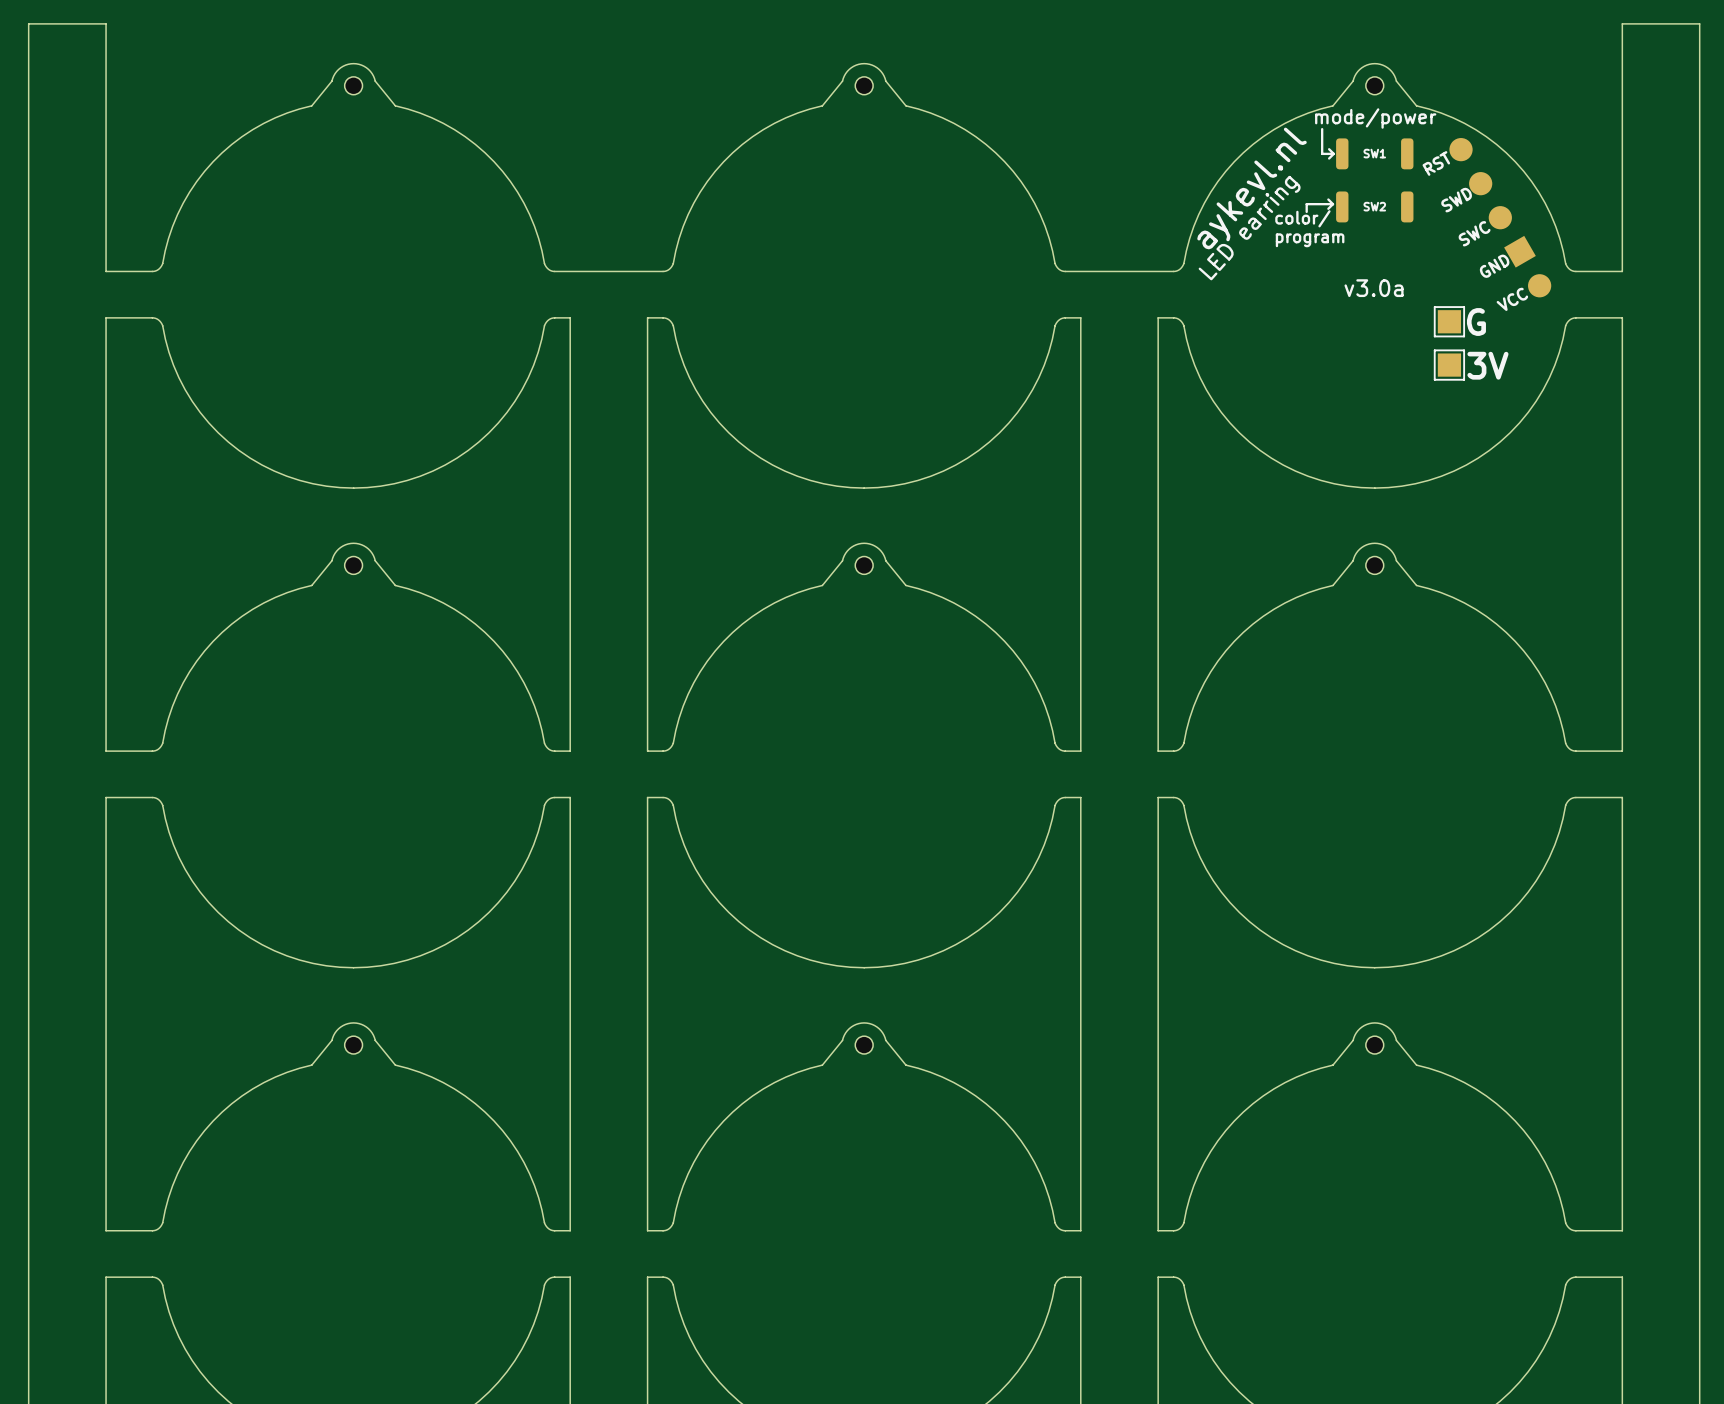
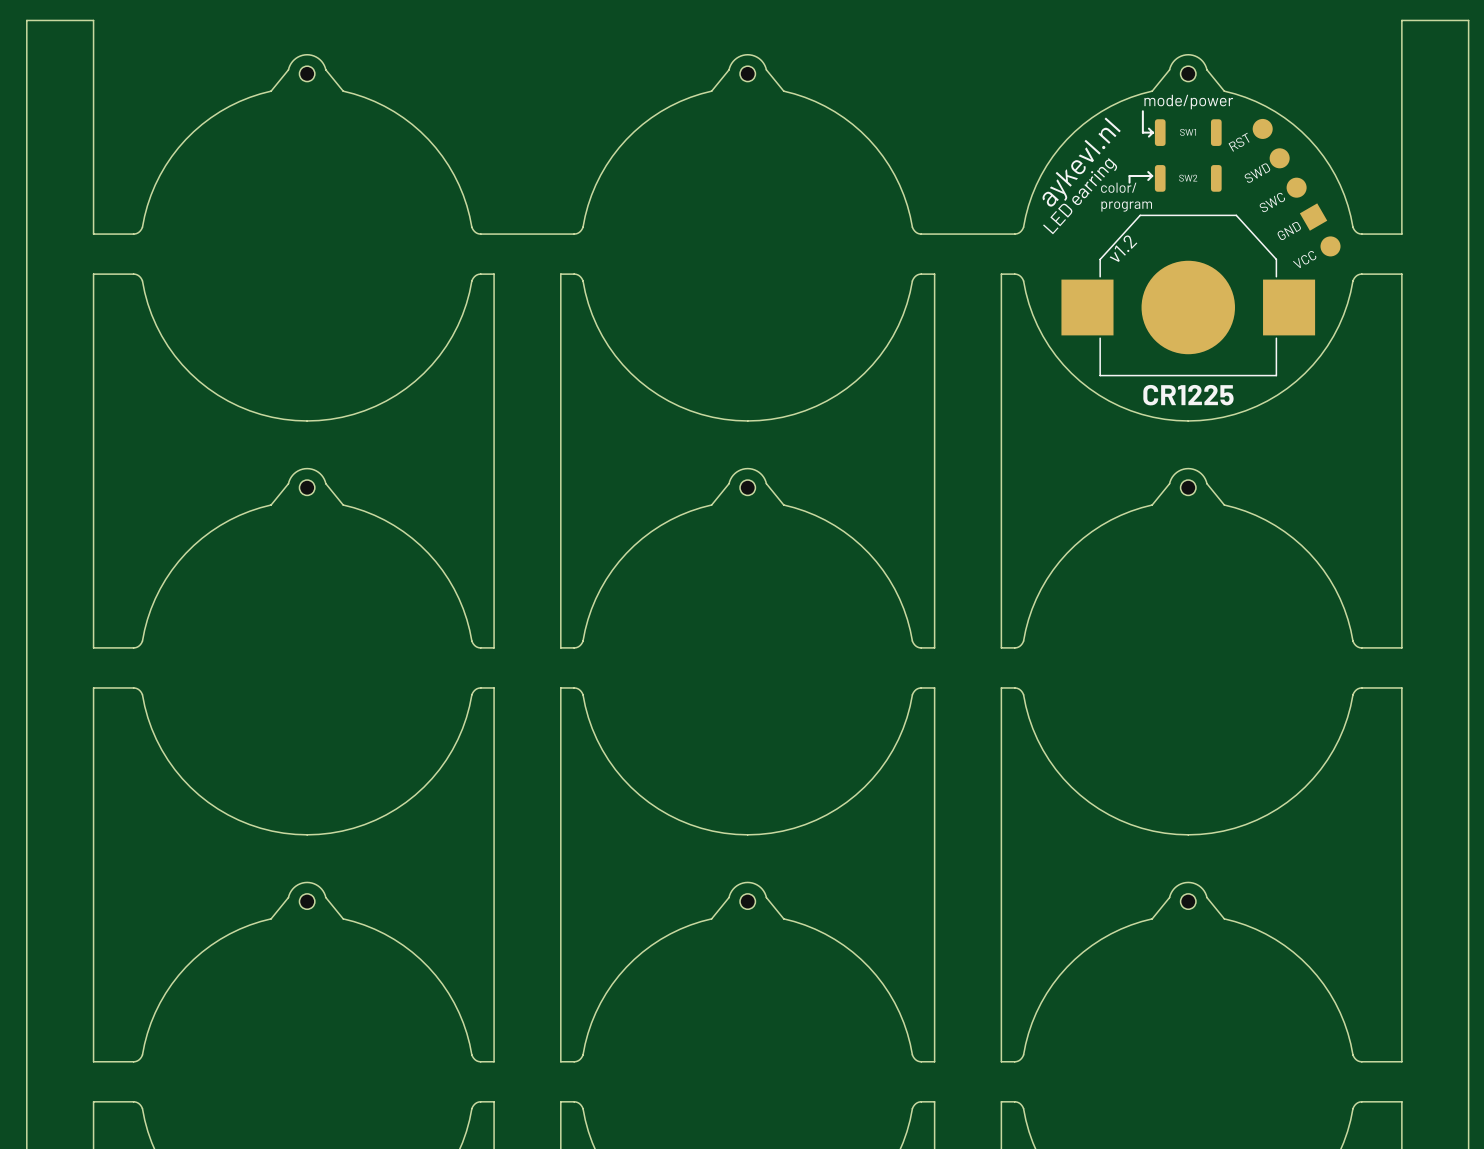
text: none -> v1.2 (1123, 248)
text: v3.0a (1374, 288) -> none
part: (1449, 321) -> none
text: G (1476, 322) -> none
part: none -> (1188, 295)
part: (1449, 365) -> none
text: 3V (1487, 365) -> none
text: none -> CR1225 (1188, 395)

